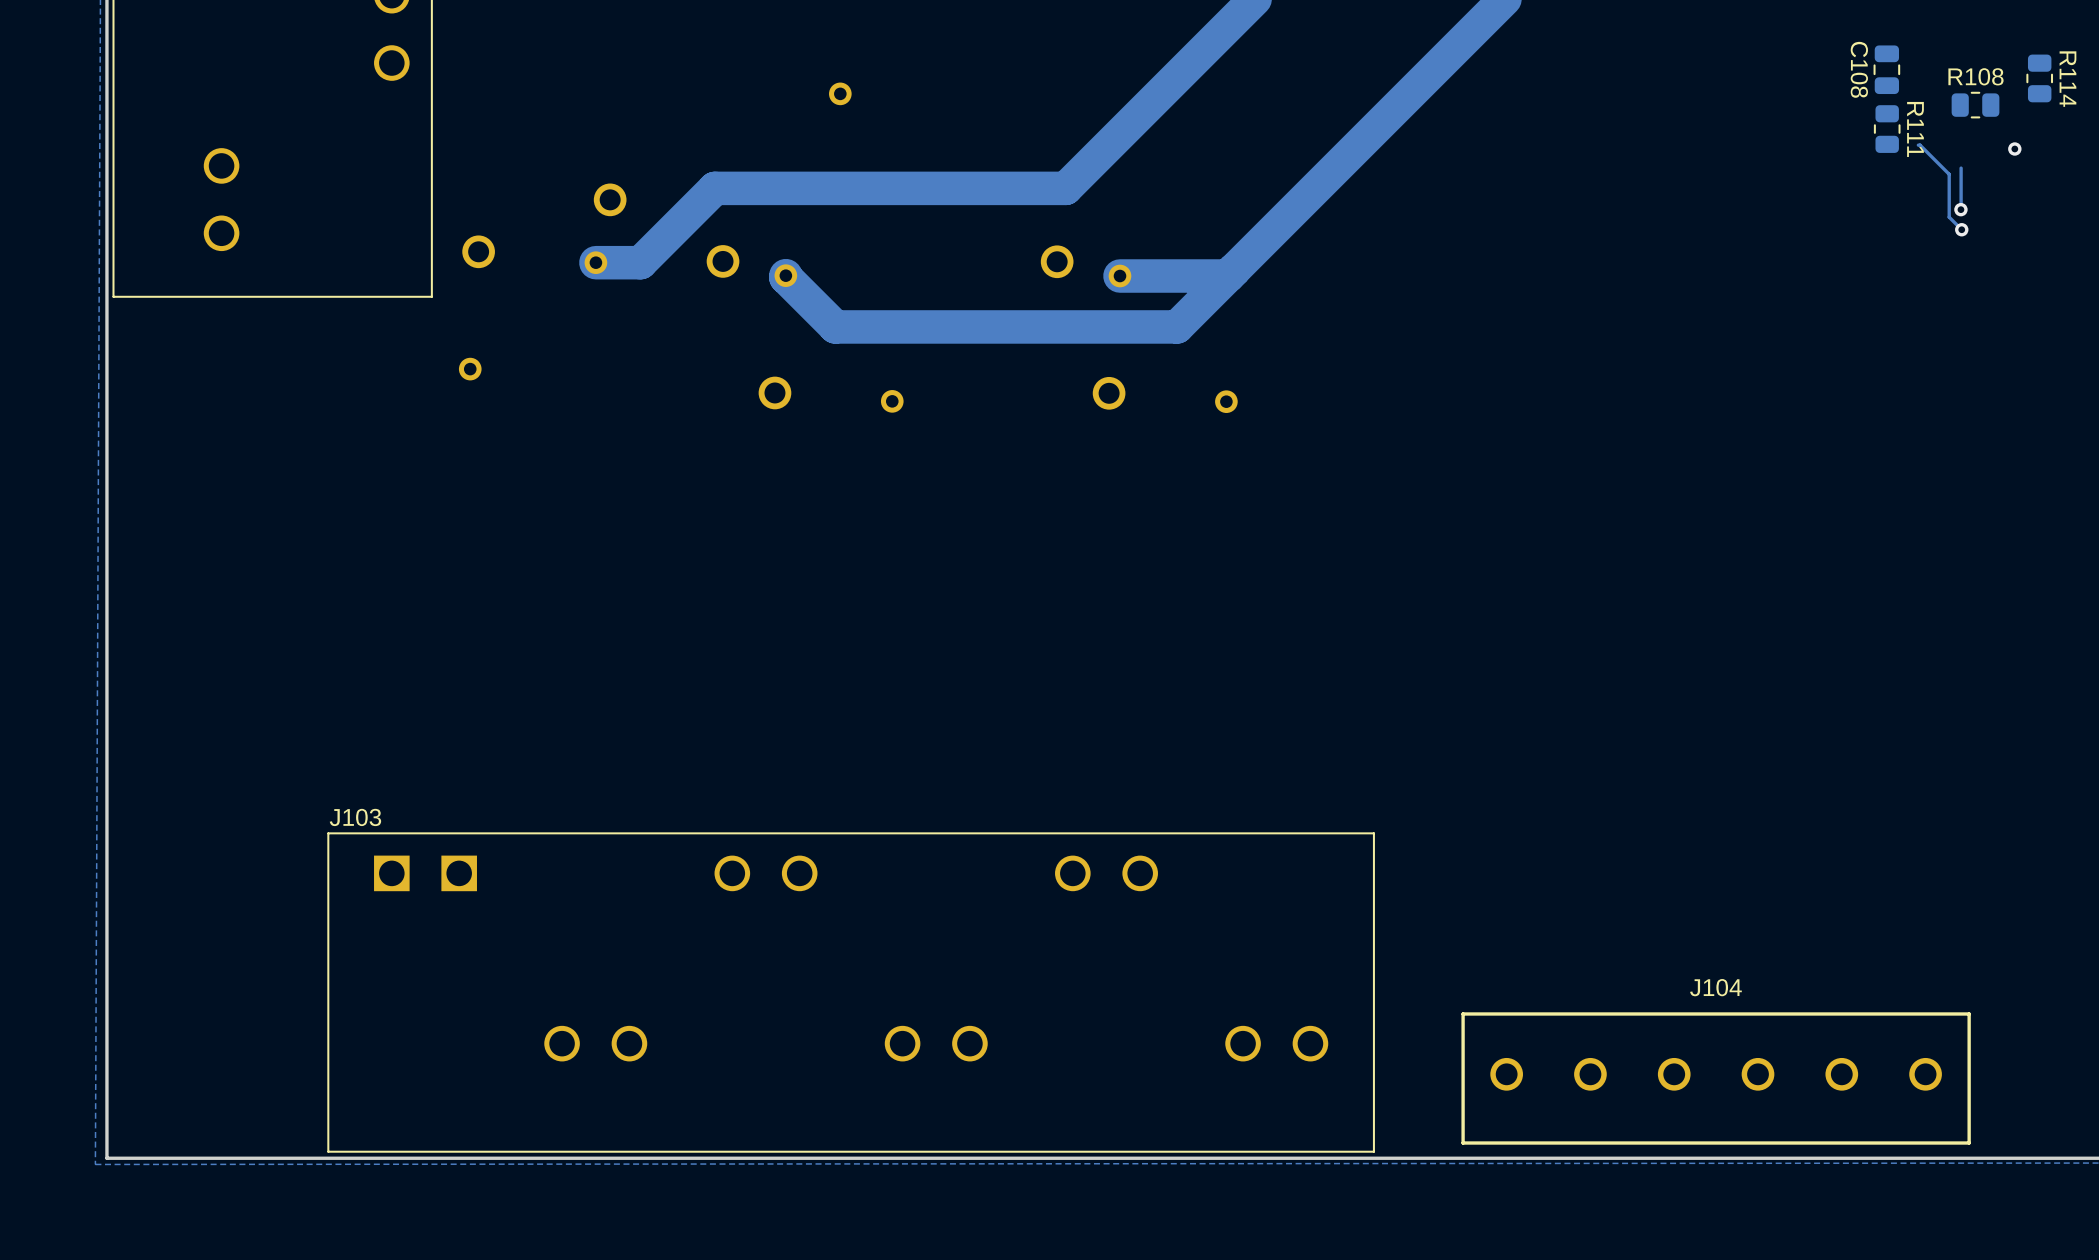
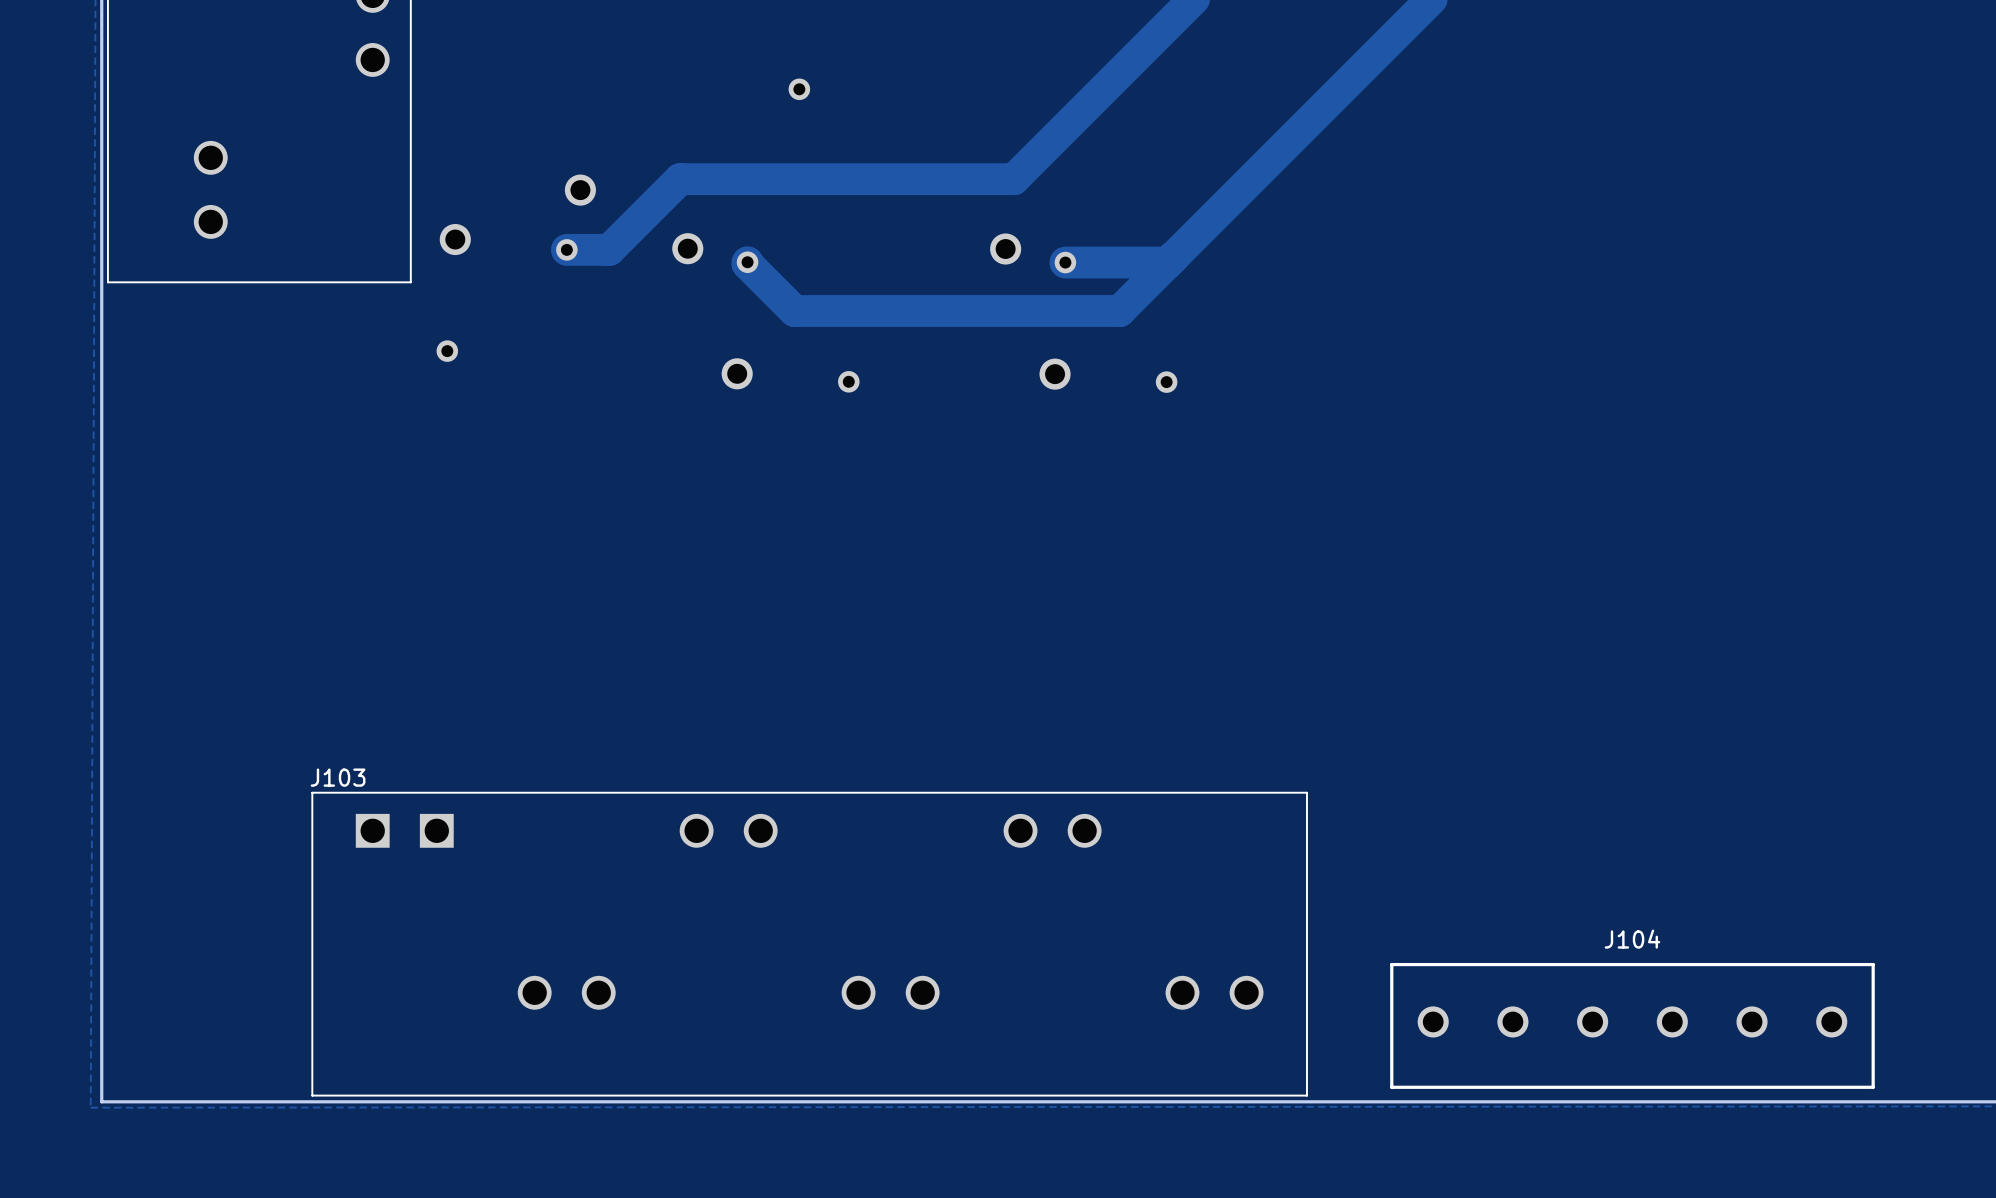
C108: (1886, 69) -> none
R114: (2039, 78) -> none
R108: (1975, 105) -> none
R111: (1887, 129) -> none
track: (1918, 145) (1949, 174) (1949, 217) (1961, 229) -> none
via: (2014, 148) -> none
track: (1961, 168) (1961, 209) -> none
via: (1960, 209) -> none
via: (1961, 229) -> none

